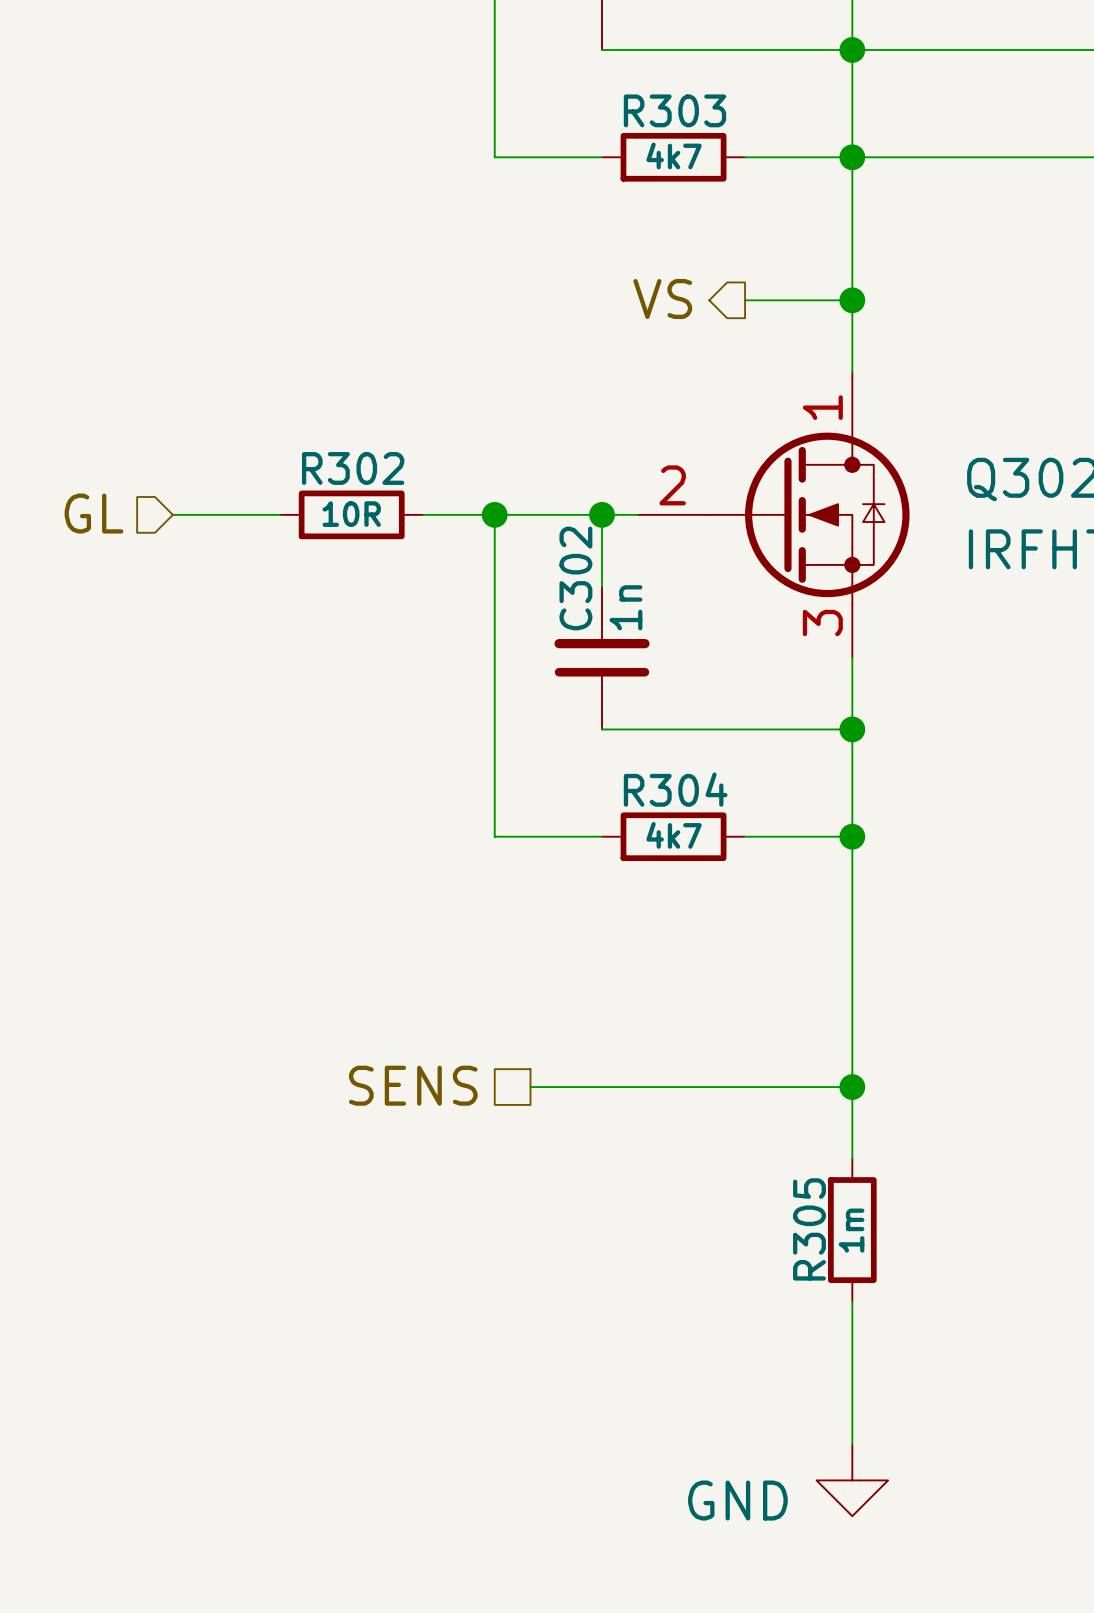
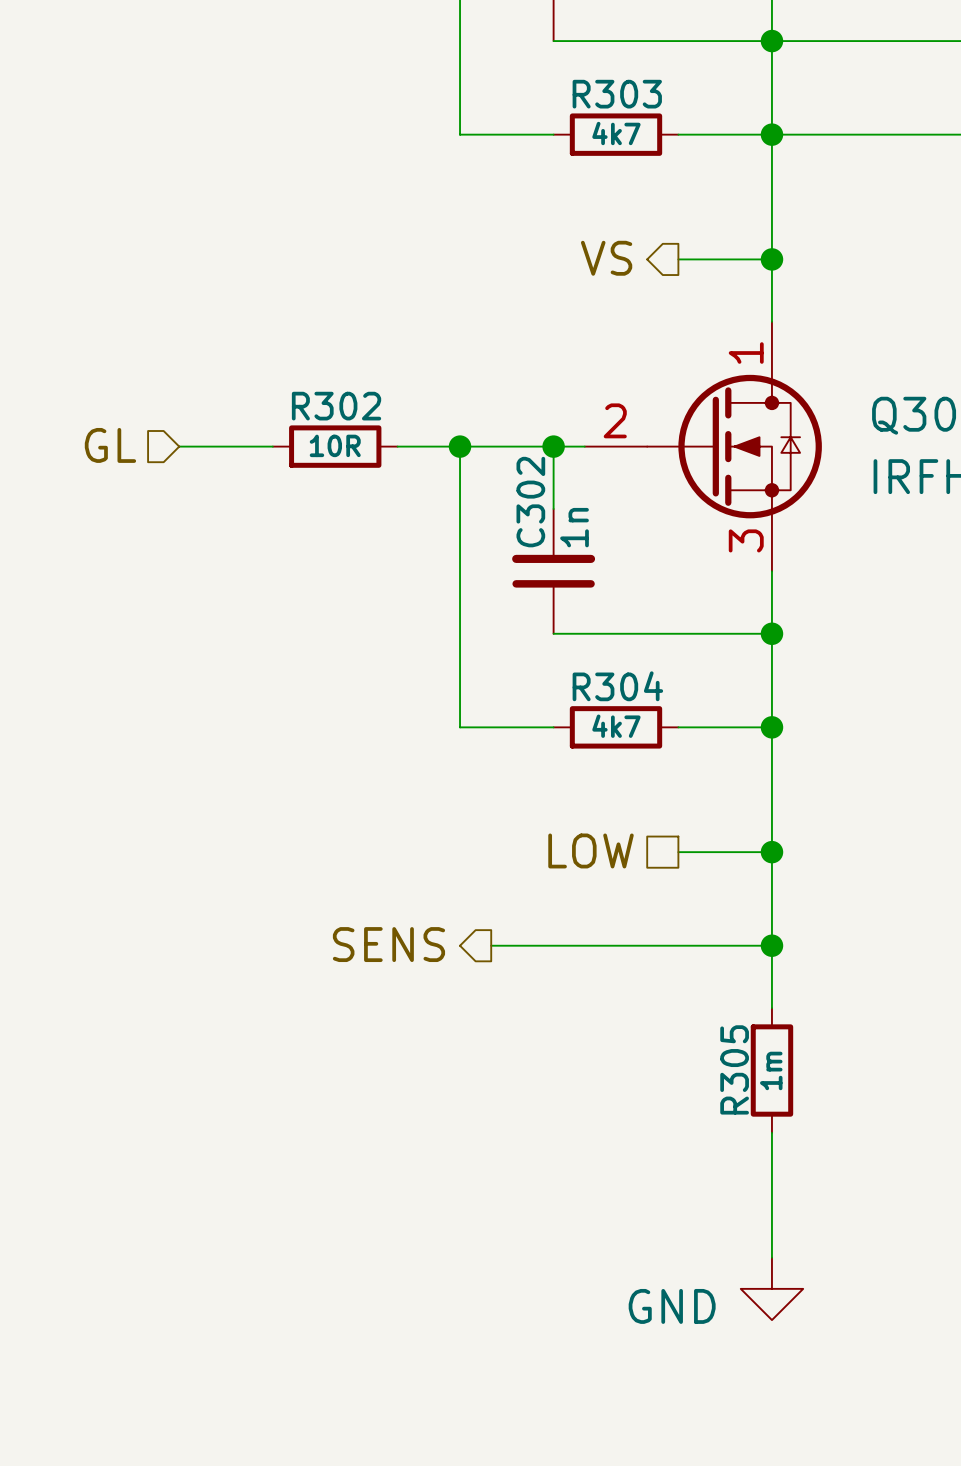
hierarchical label: none -> LOW (591, 850)
wire: none -> (678, 852) (771, 852)
junction: none -> (771, 852)
hierarchical label shape: passive (413, 1085) -> output (388, 944)

